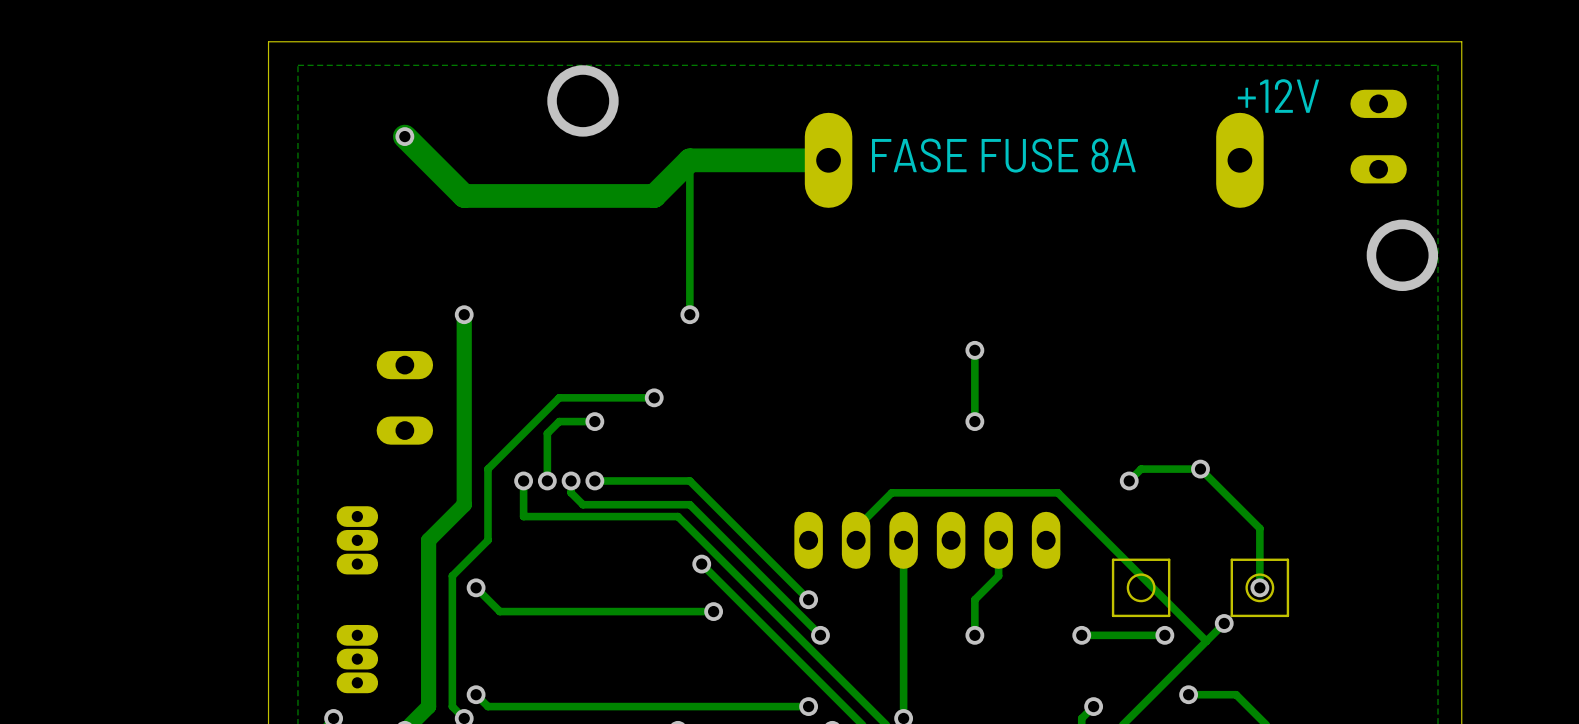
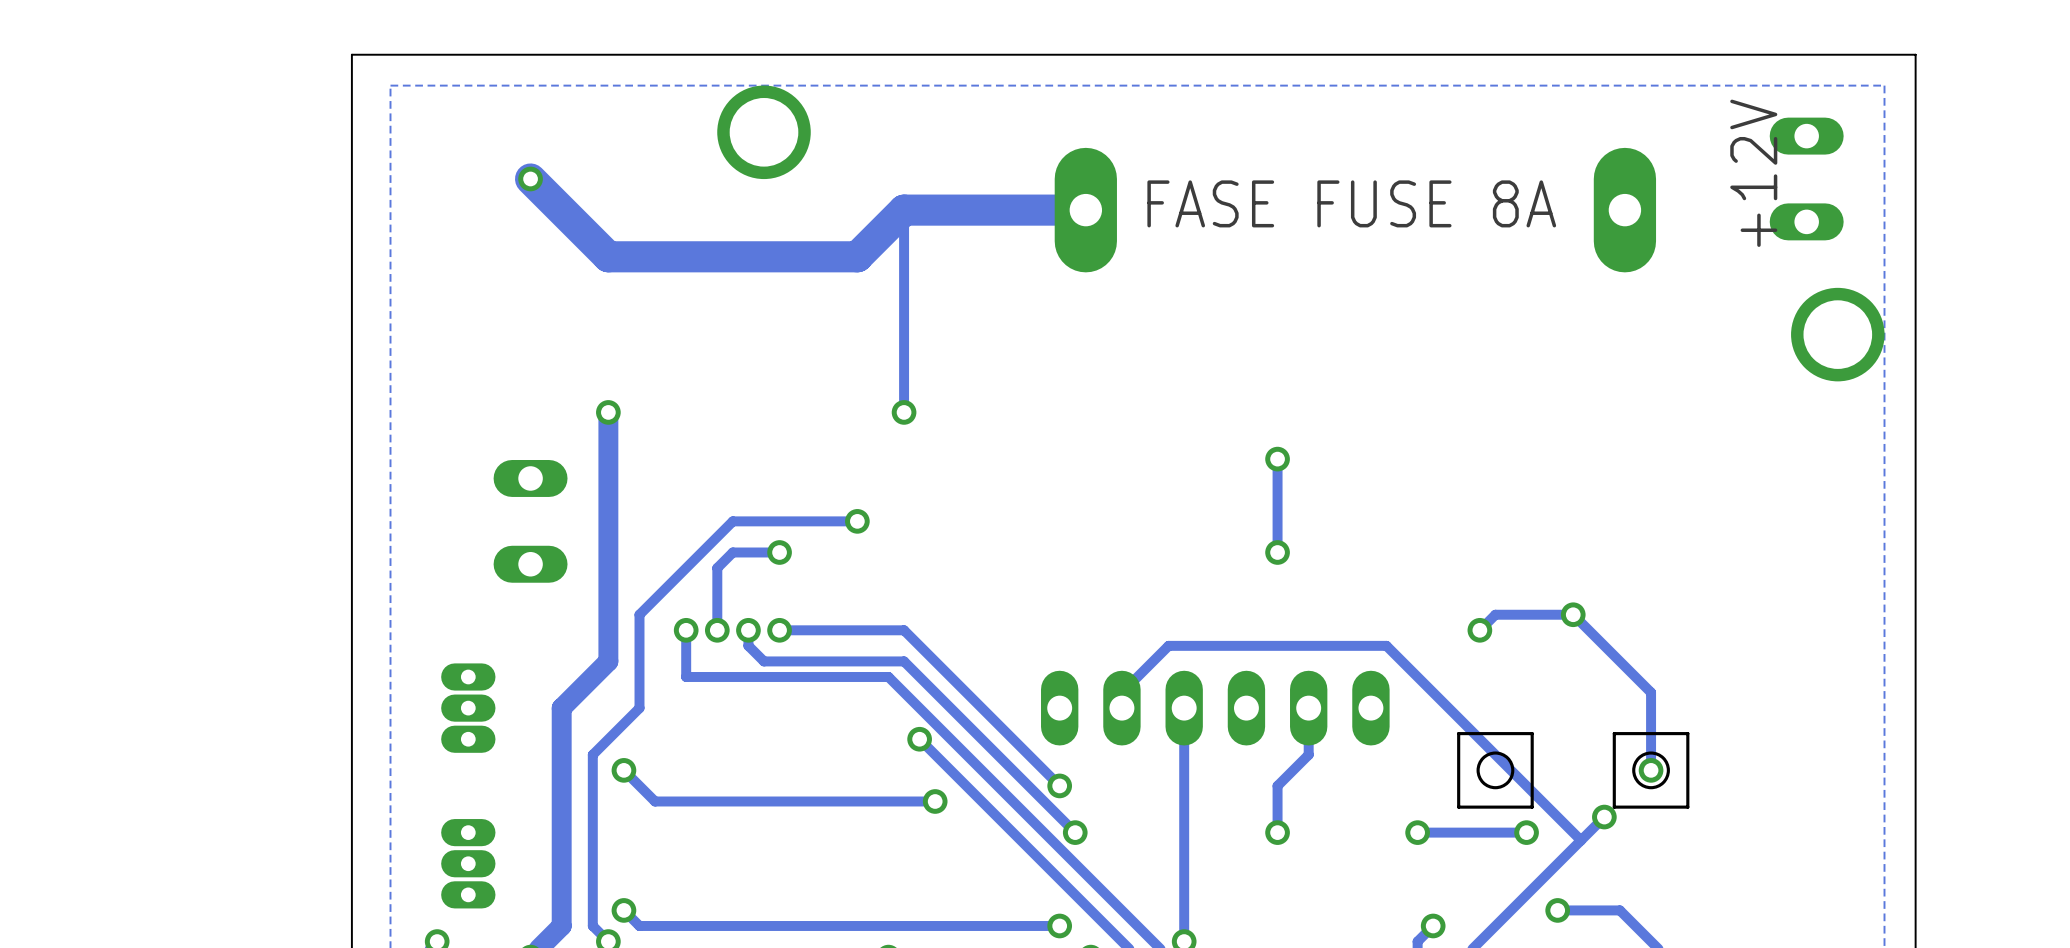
text rotation: 0° (1278, 96) -> 90° counterclockwise (1753, 173)

